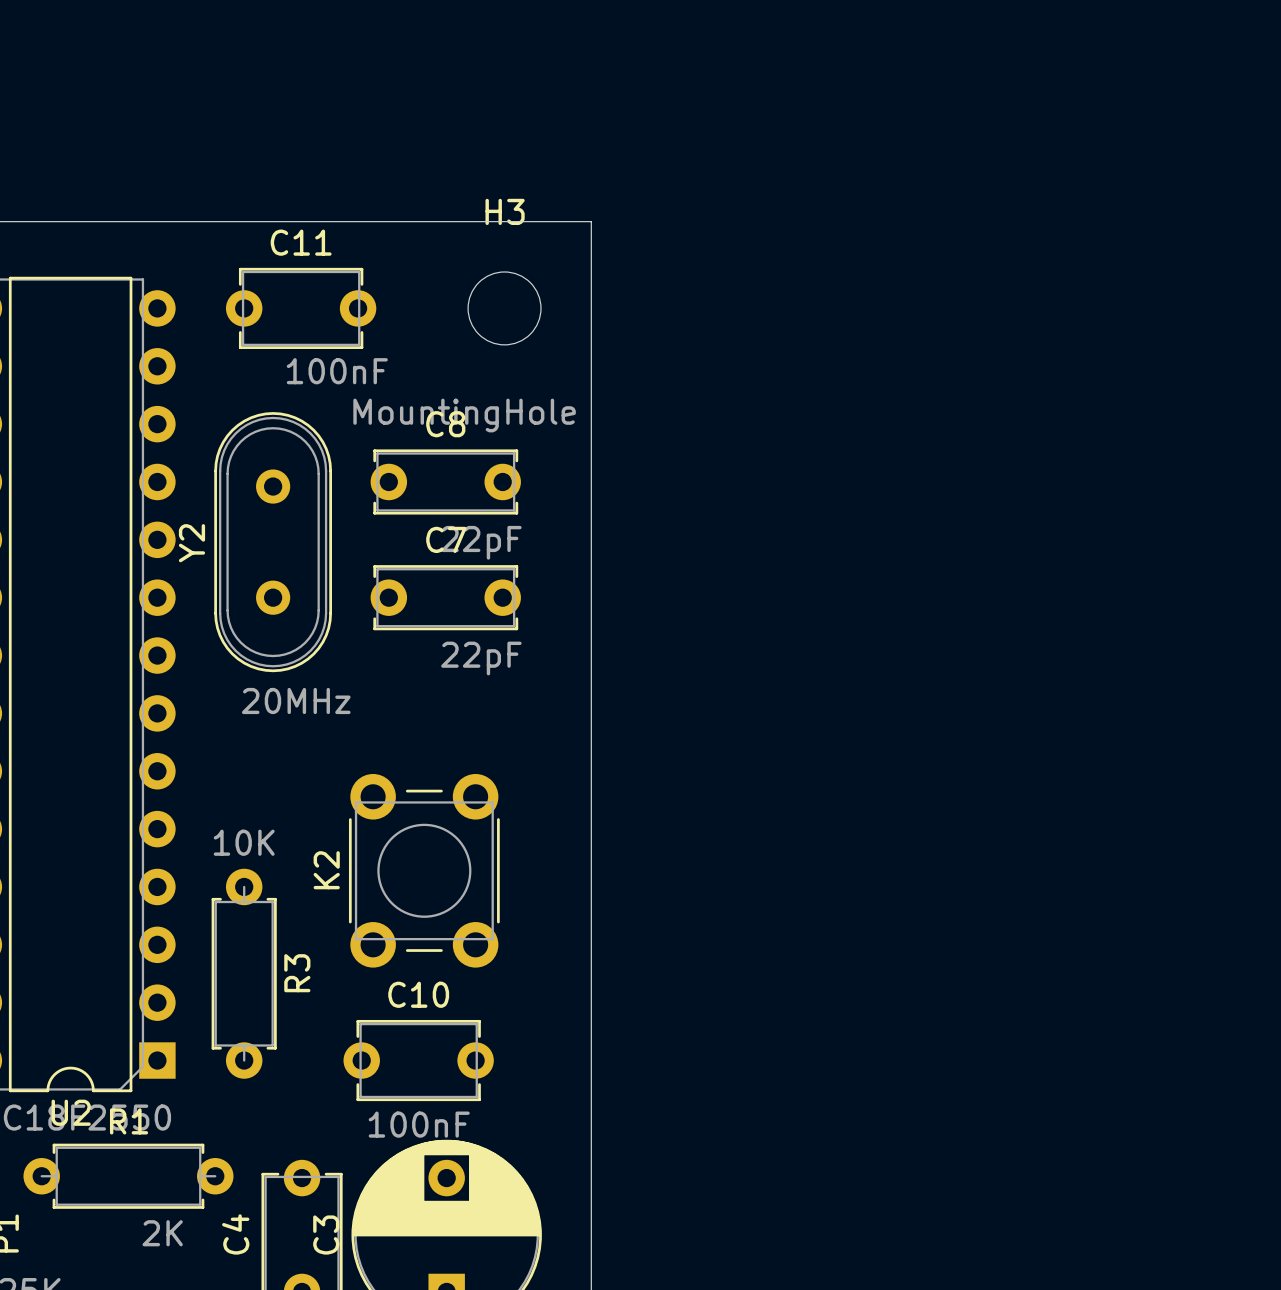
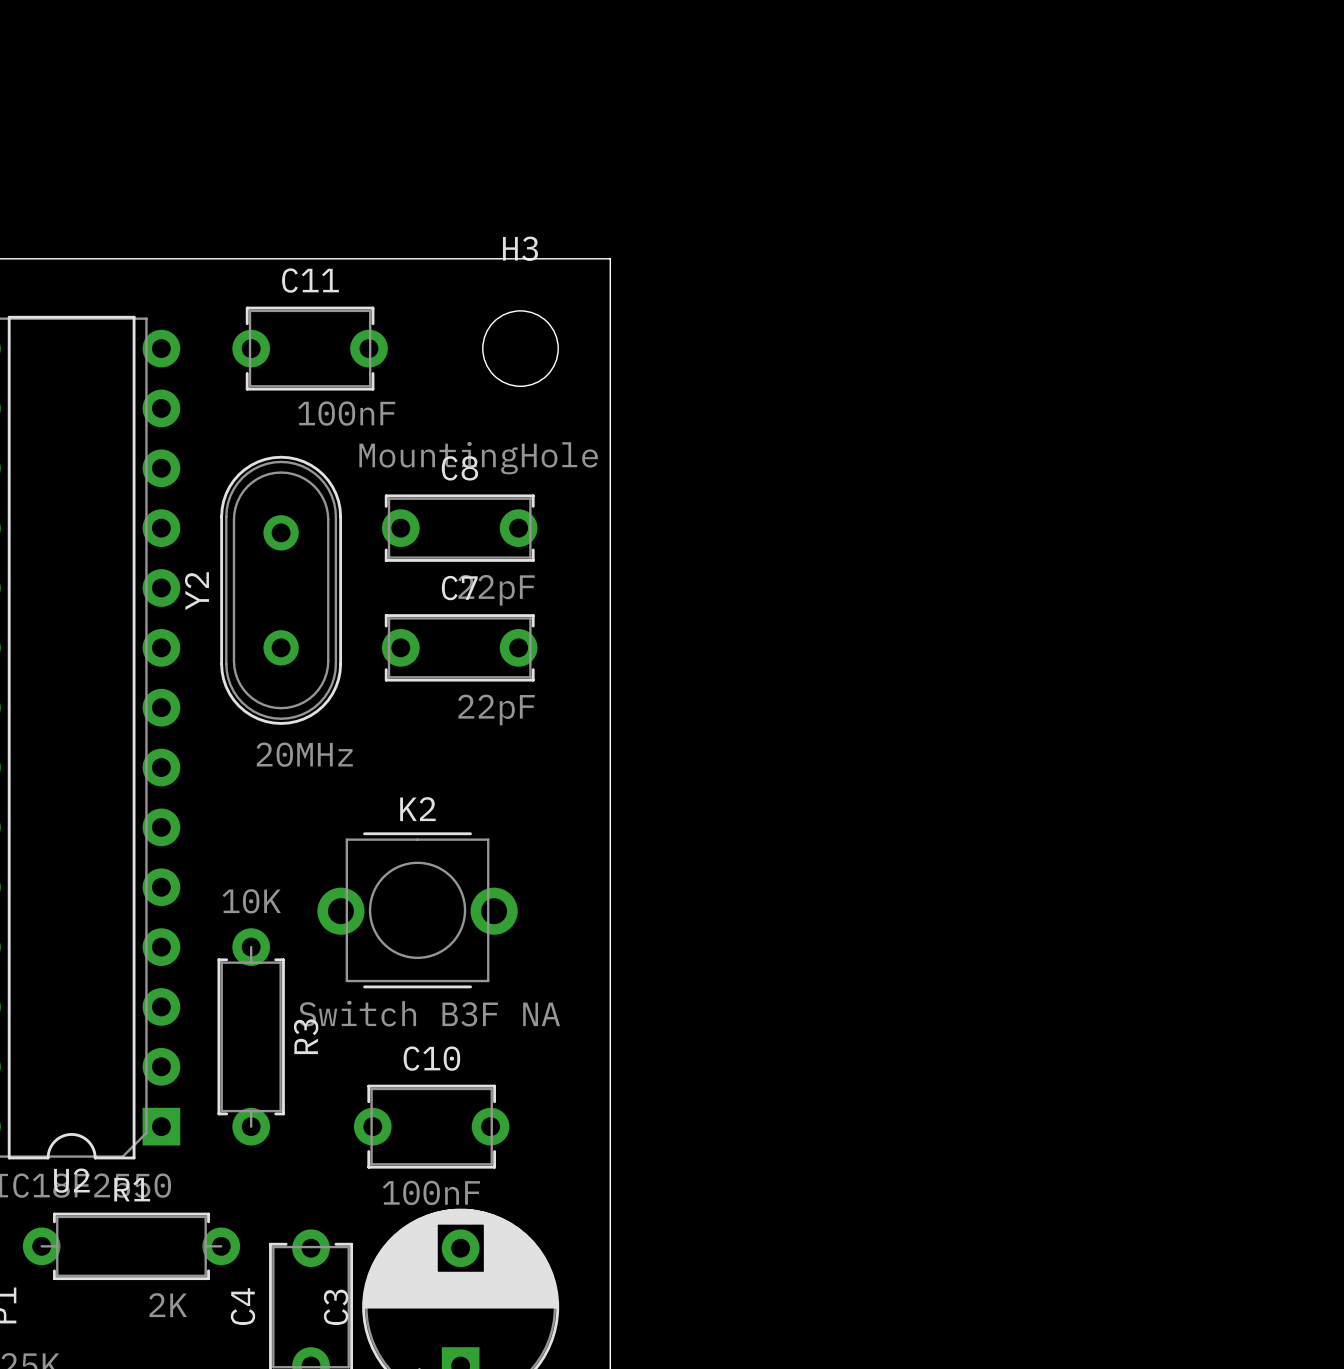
K2 footprint: [348, 773, 500, 968] -> [317, 832, 518, 989]
K2 name position: K2 (326, 870) -> K2 (417, 809)
K2 value: none -> Switch B3F NA (429, 1013)

